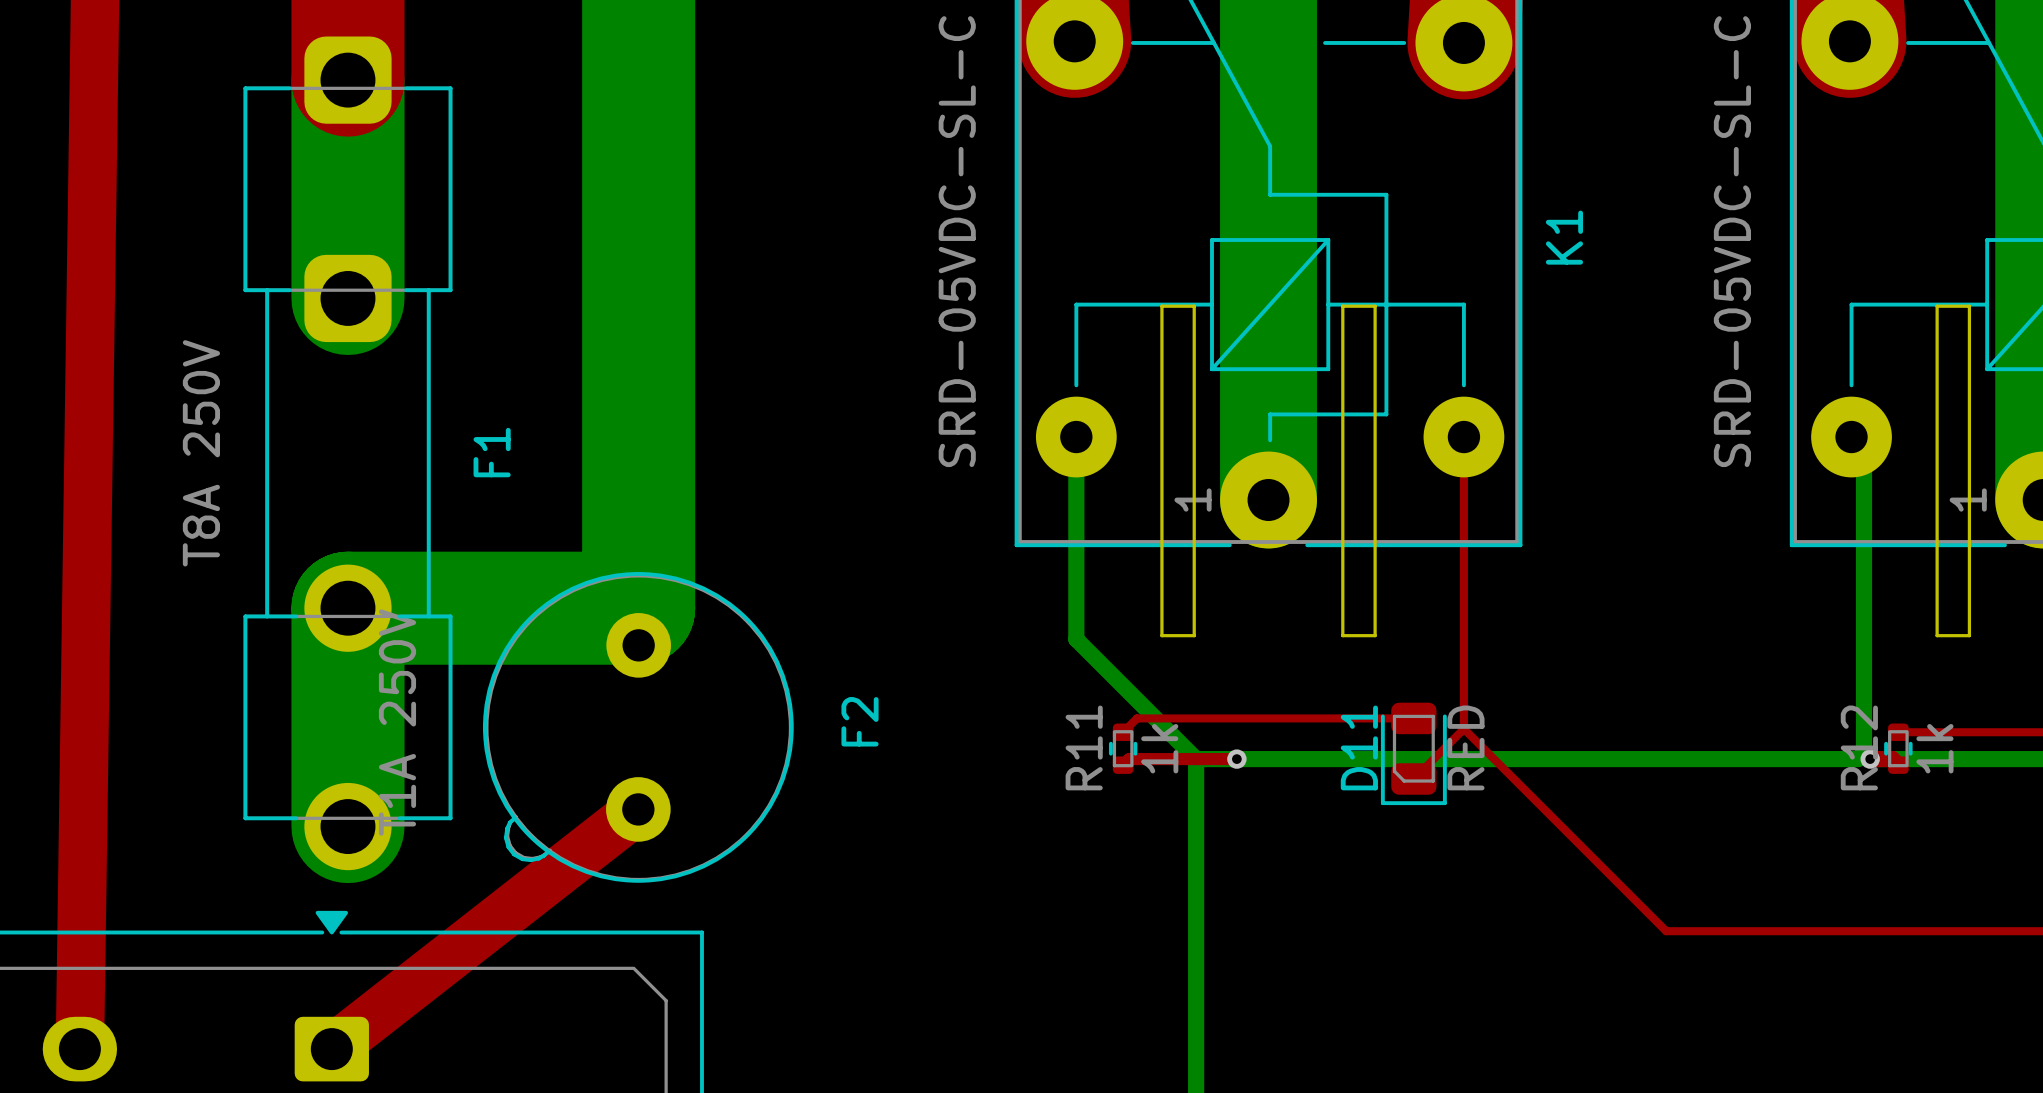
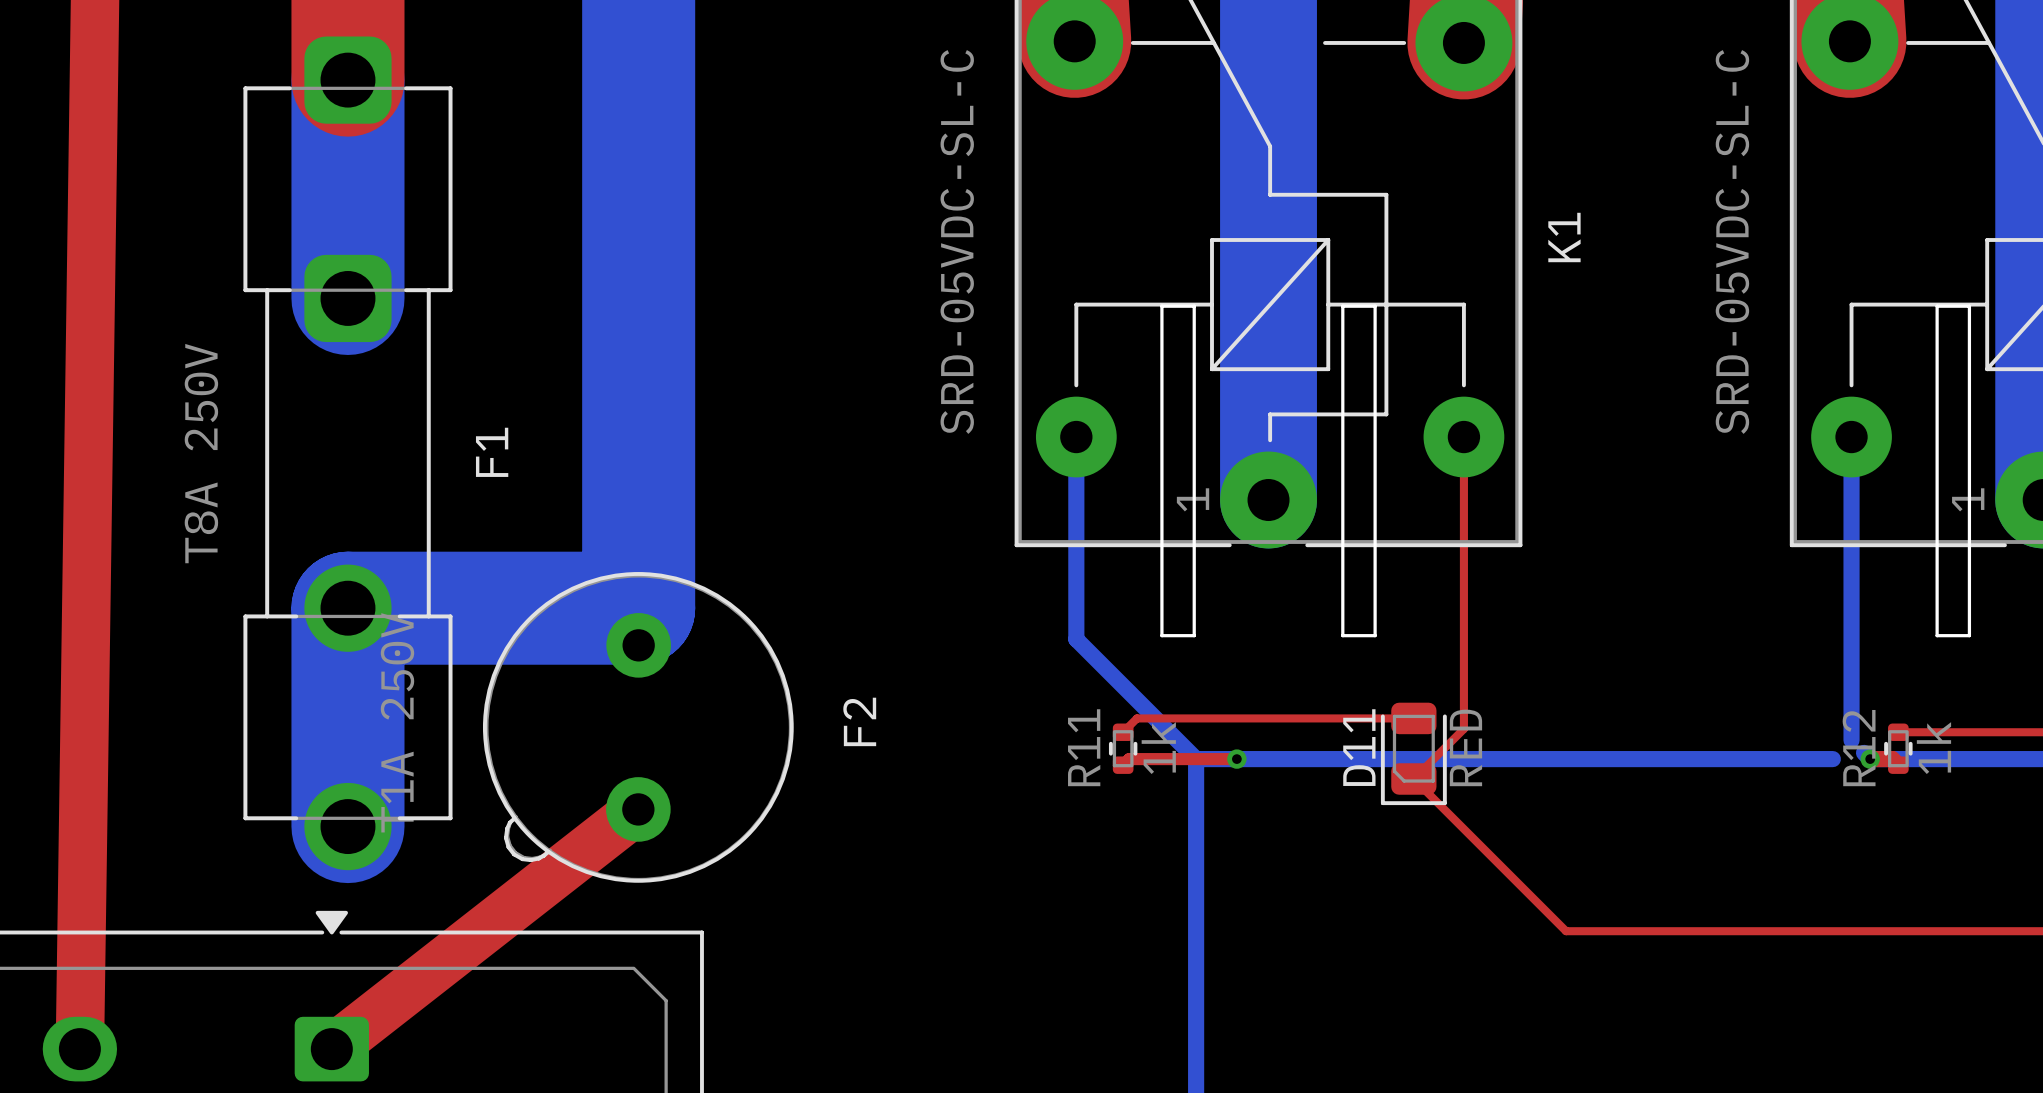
bottom track: (1851, 437) (1864, 449) (1864, 752) (1857, 759) (1832, 759) -> (1851, 437) (1851, 740)
top track: (1463, 728) (1666, 931) -> (1413, 778) (1566, 931) (1666, 931)

